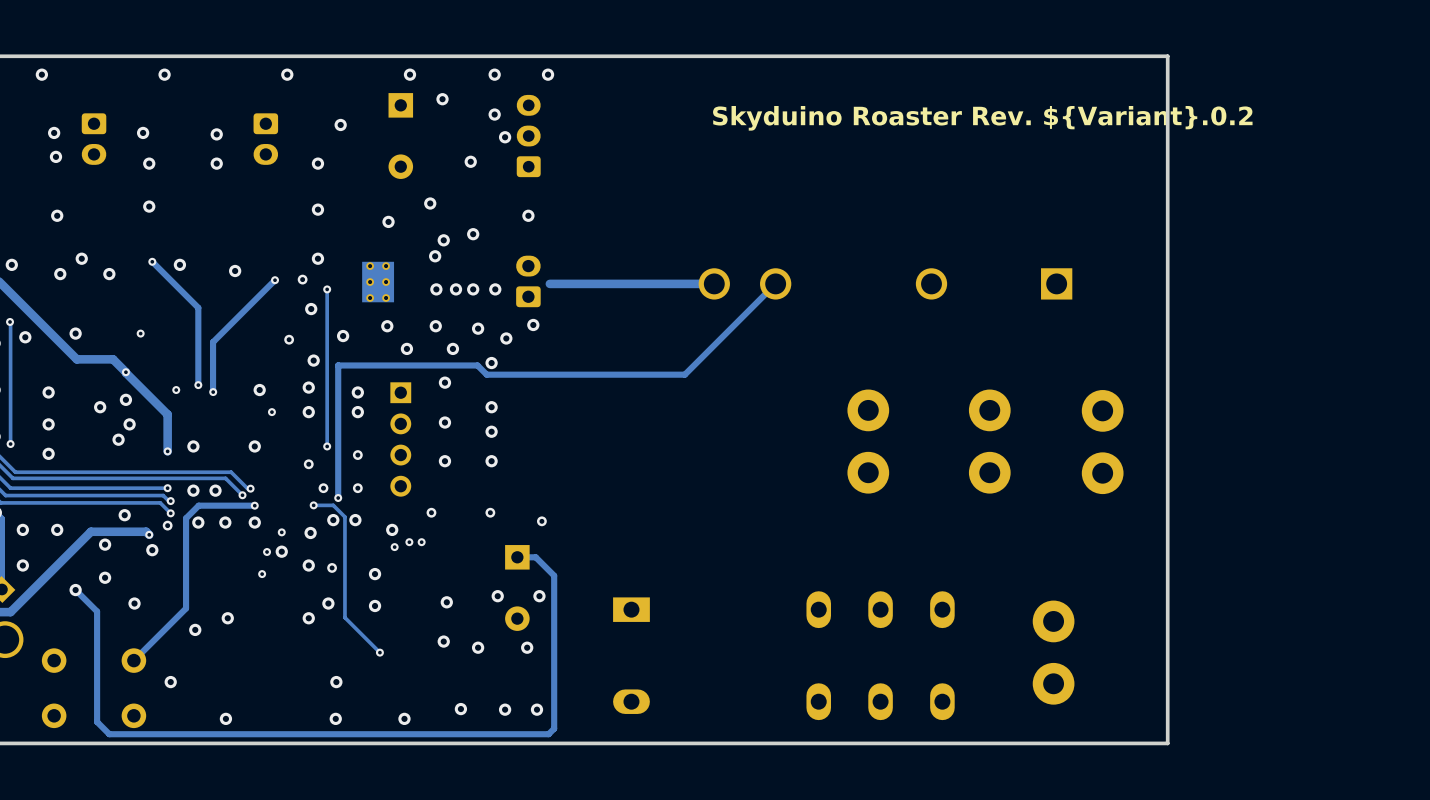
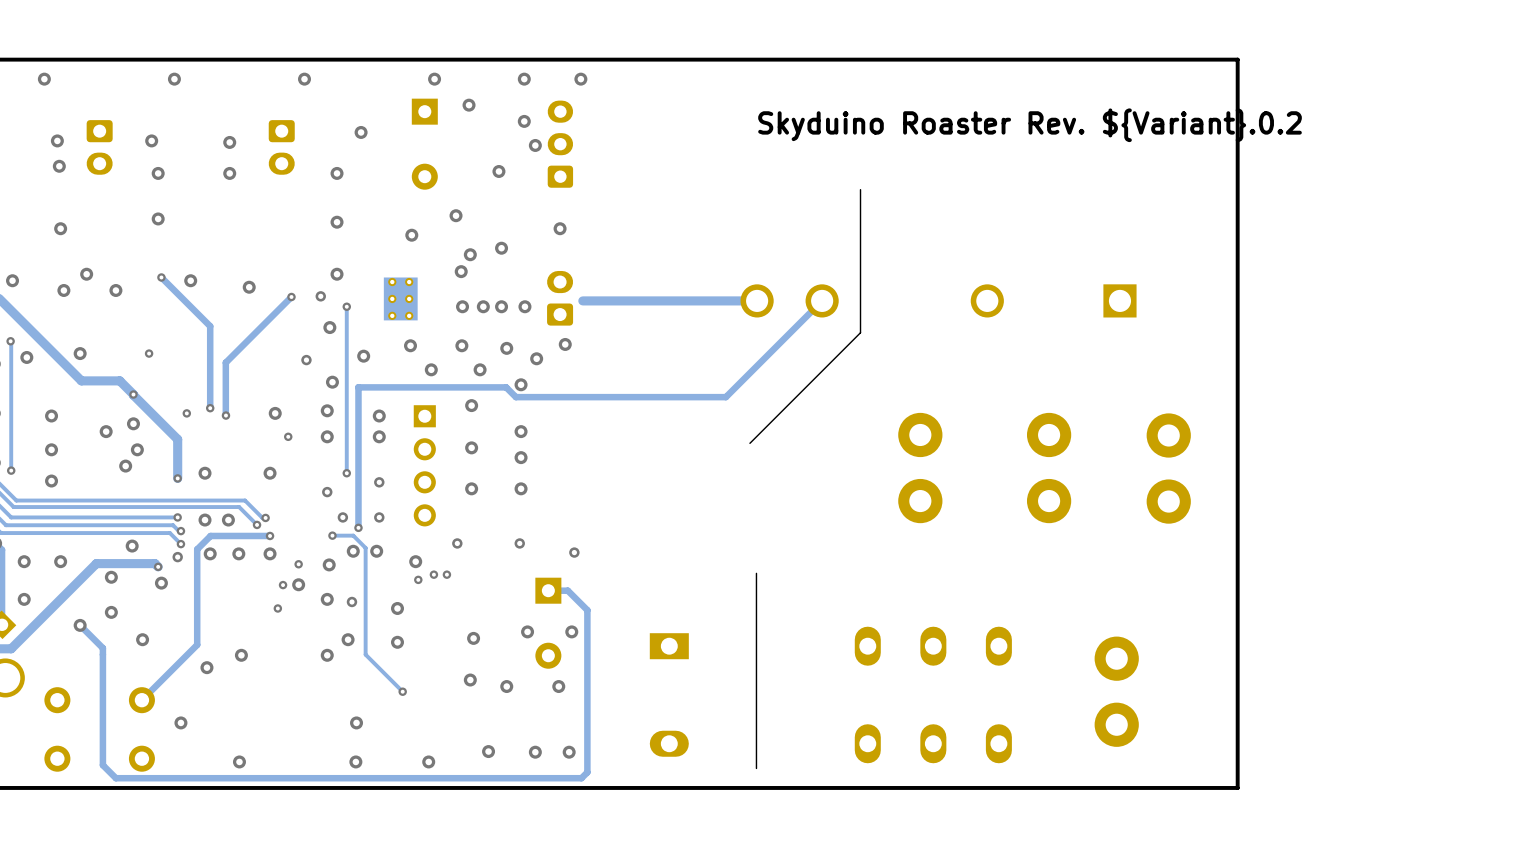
board edge: none -> (860, 189) (860, 332) (749, 443)
board edge: none -> (756, 573) (756, 768)

